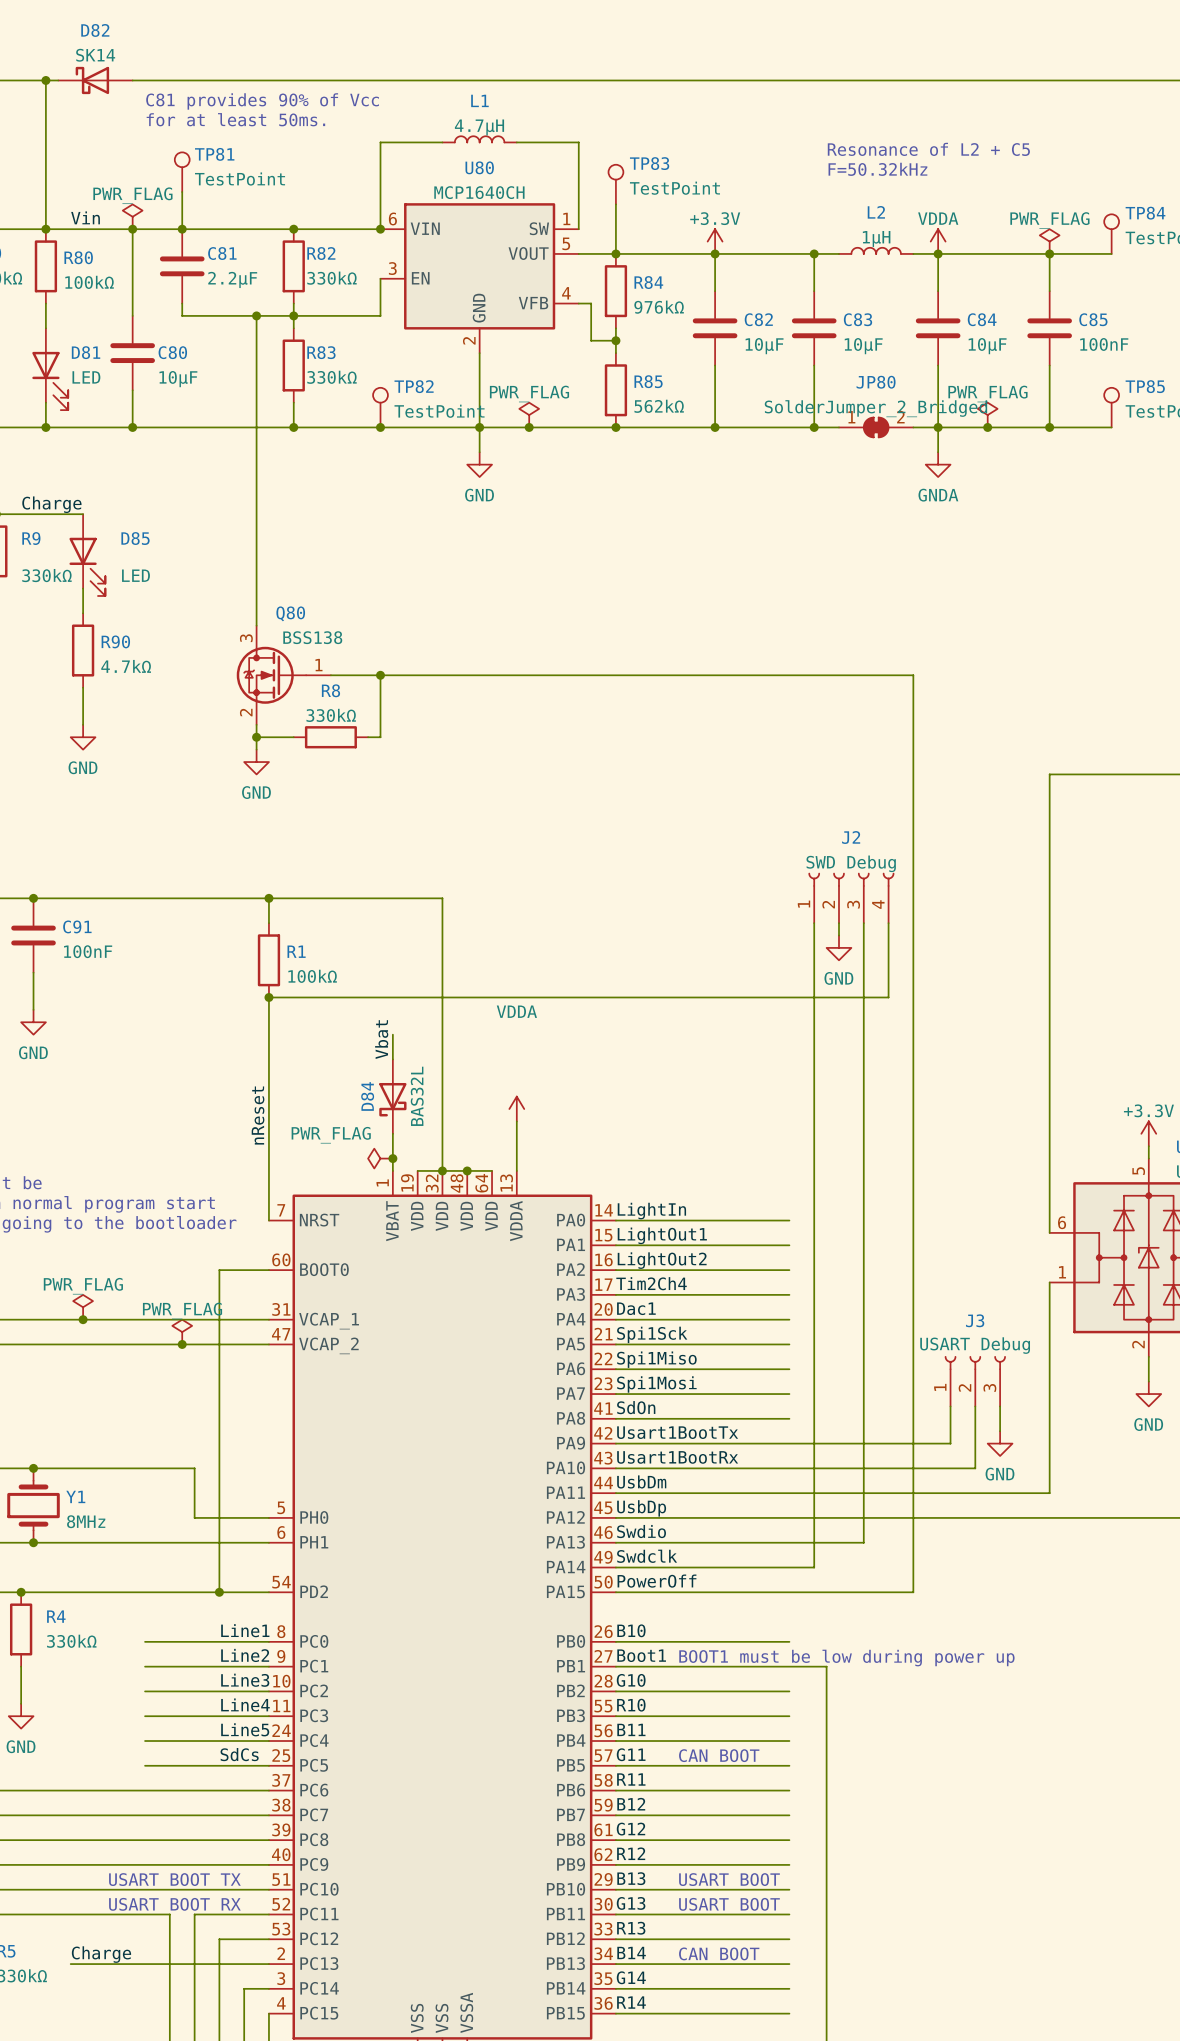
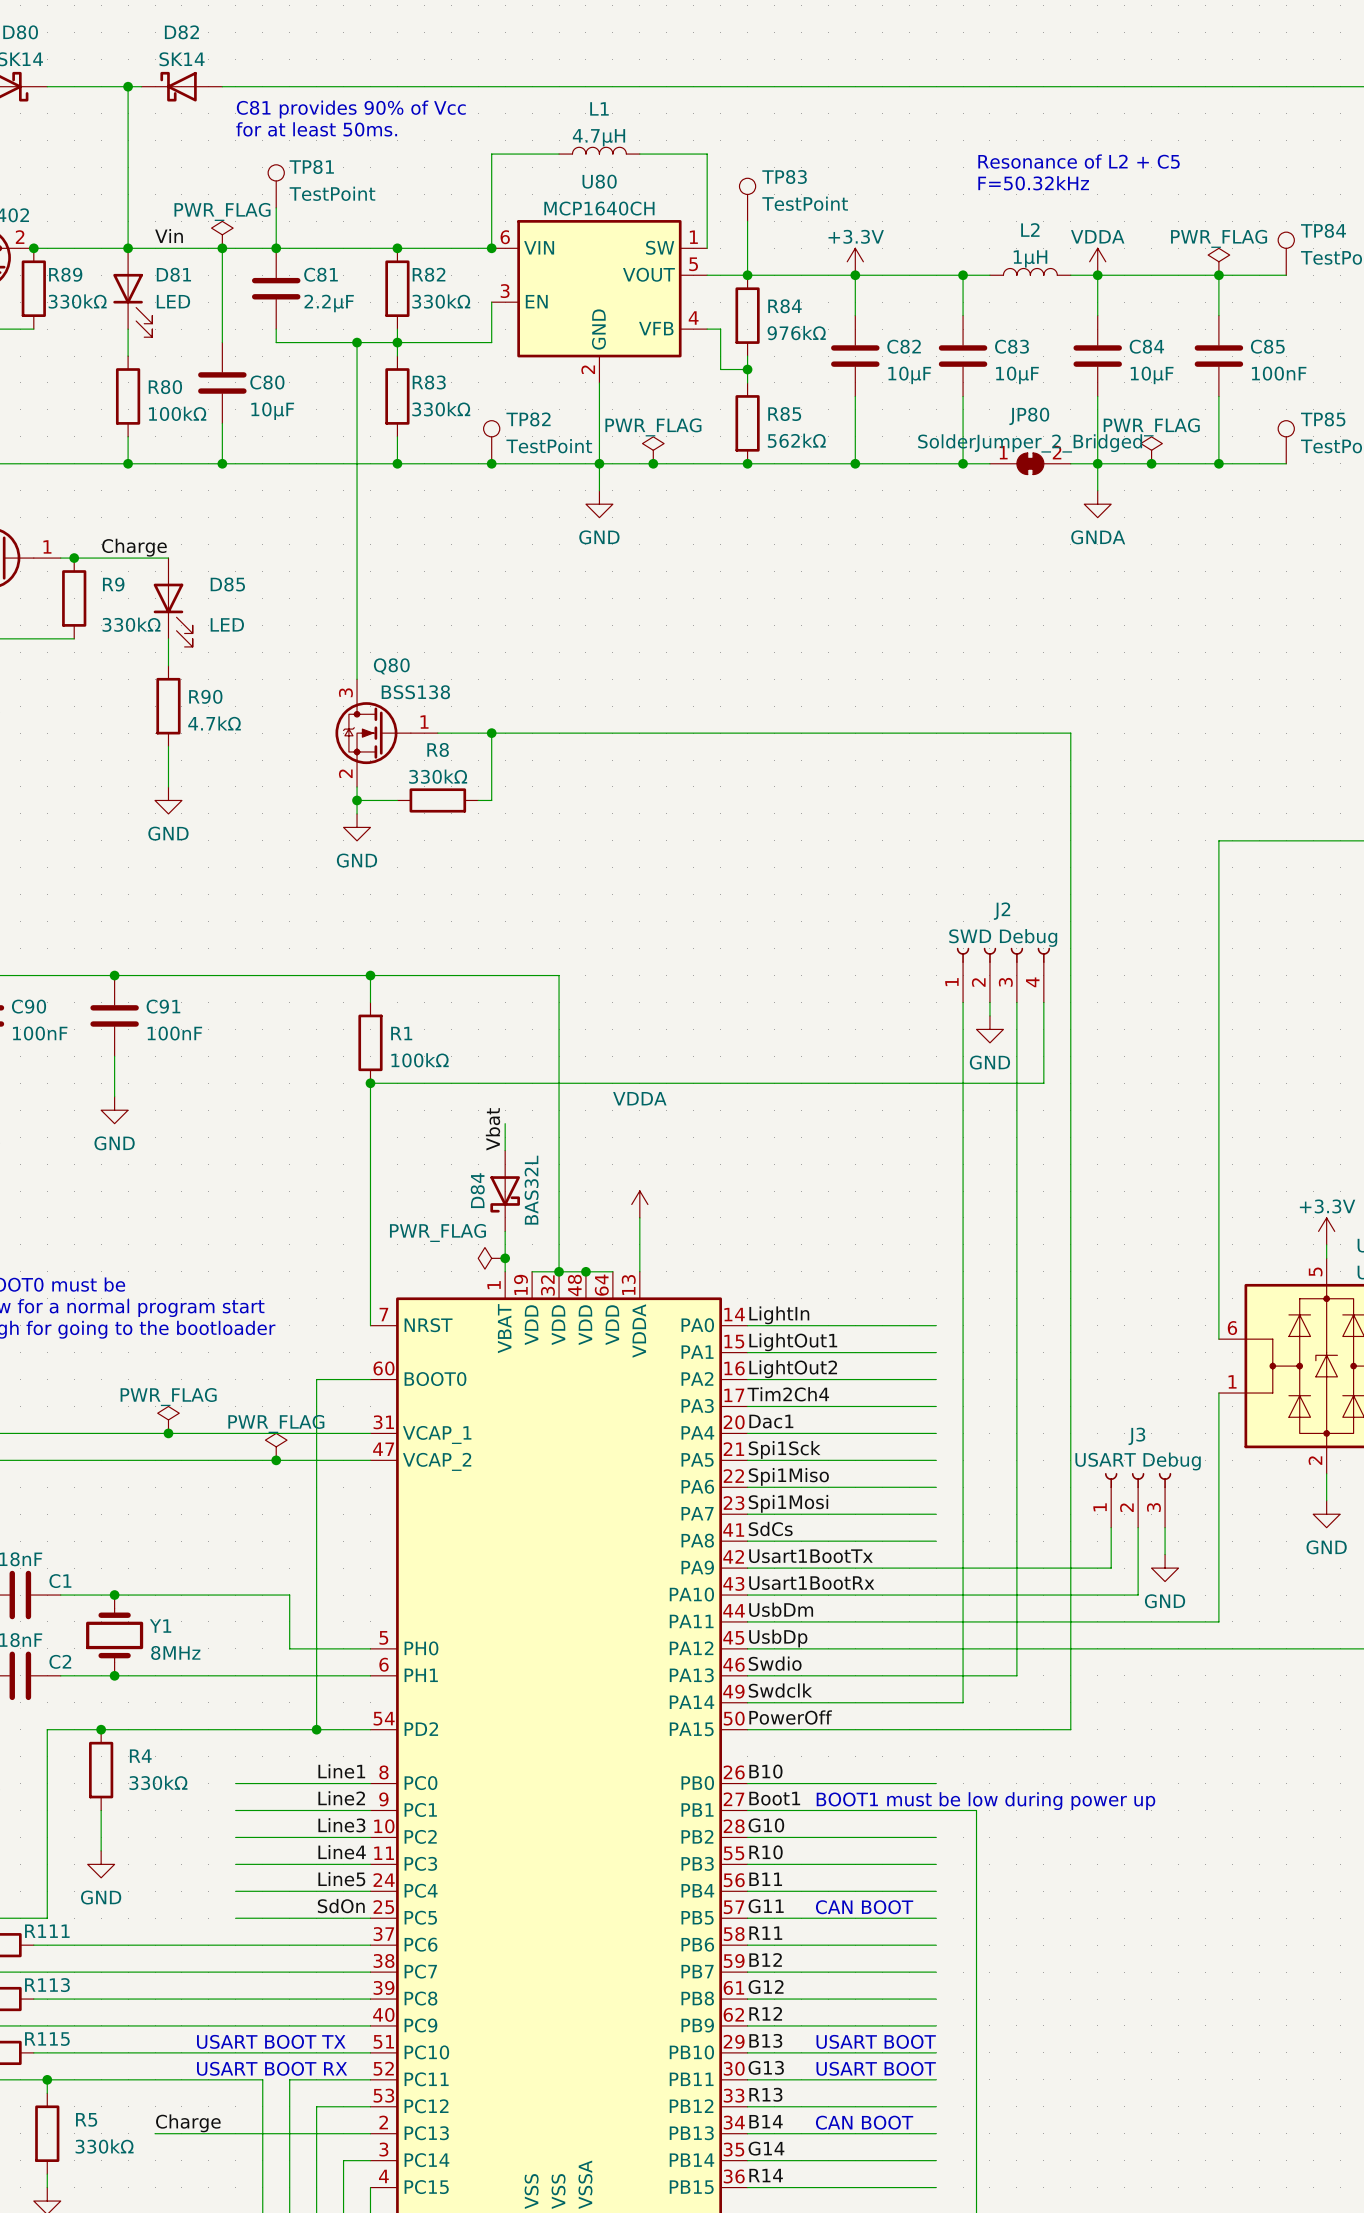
R80 position: (45, 266) -> (128, 396)
D81 position: (50, 369) -> (132, 292)
label: nReset (258, 1115) -> none
label: SdOn (636, 1407) -> SdCs (770, 1528)
label: SdCs (239, 1754) -> SdOn (341, 1906)

